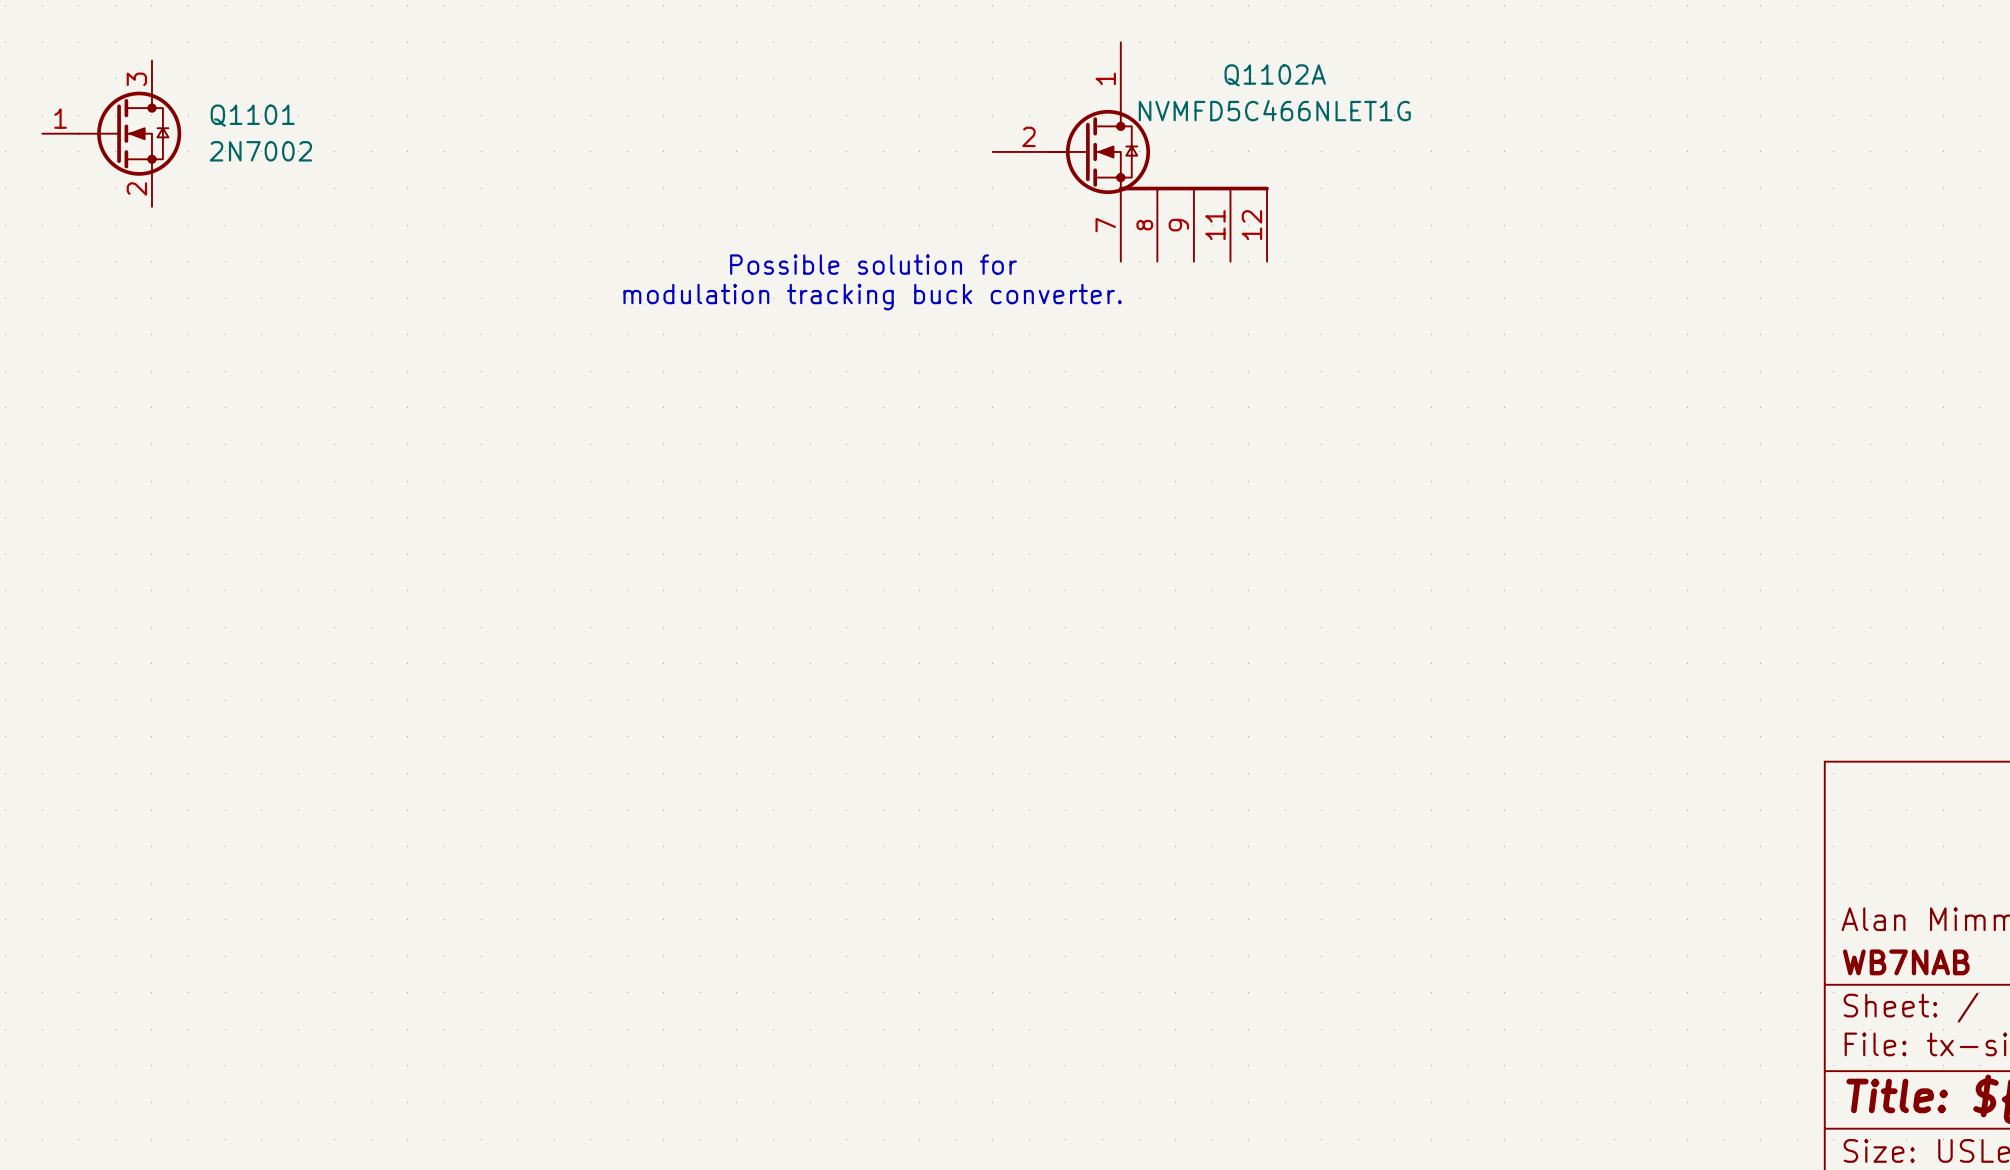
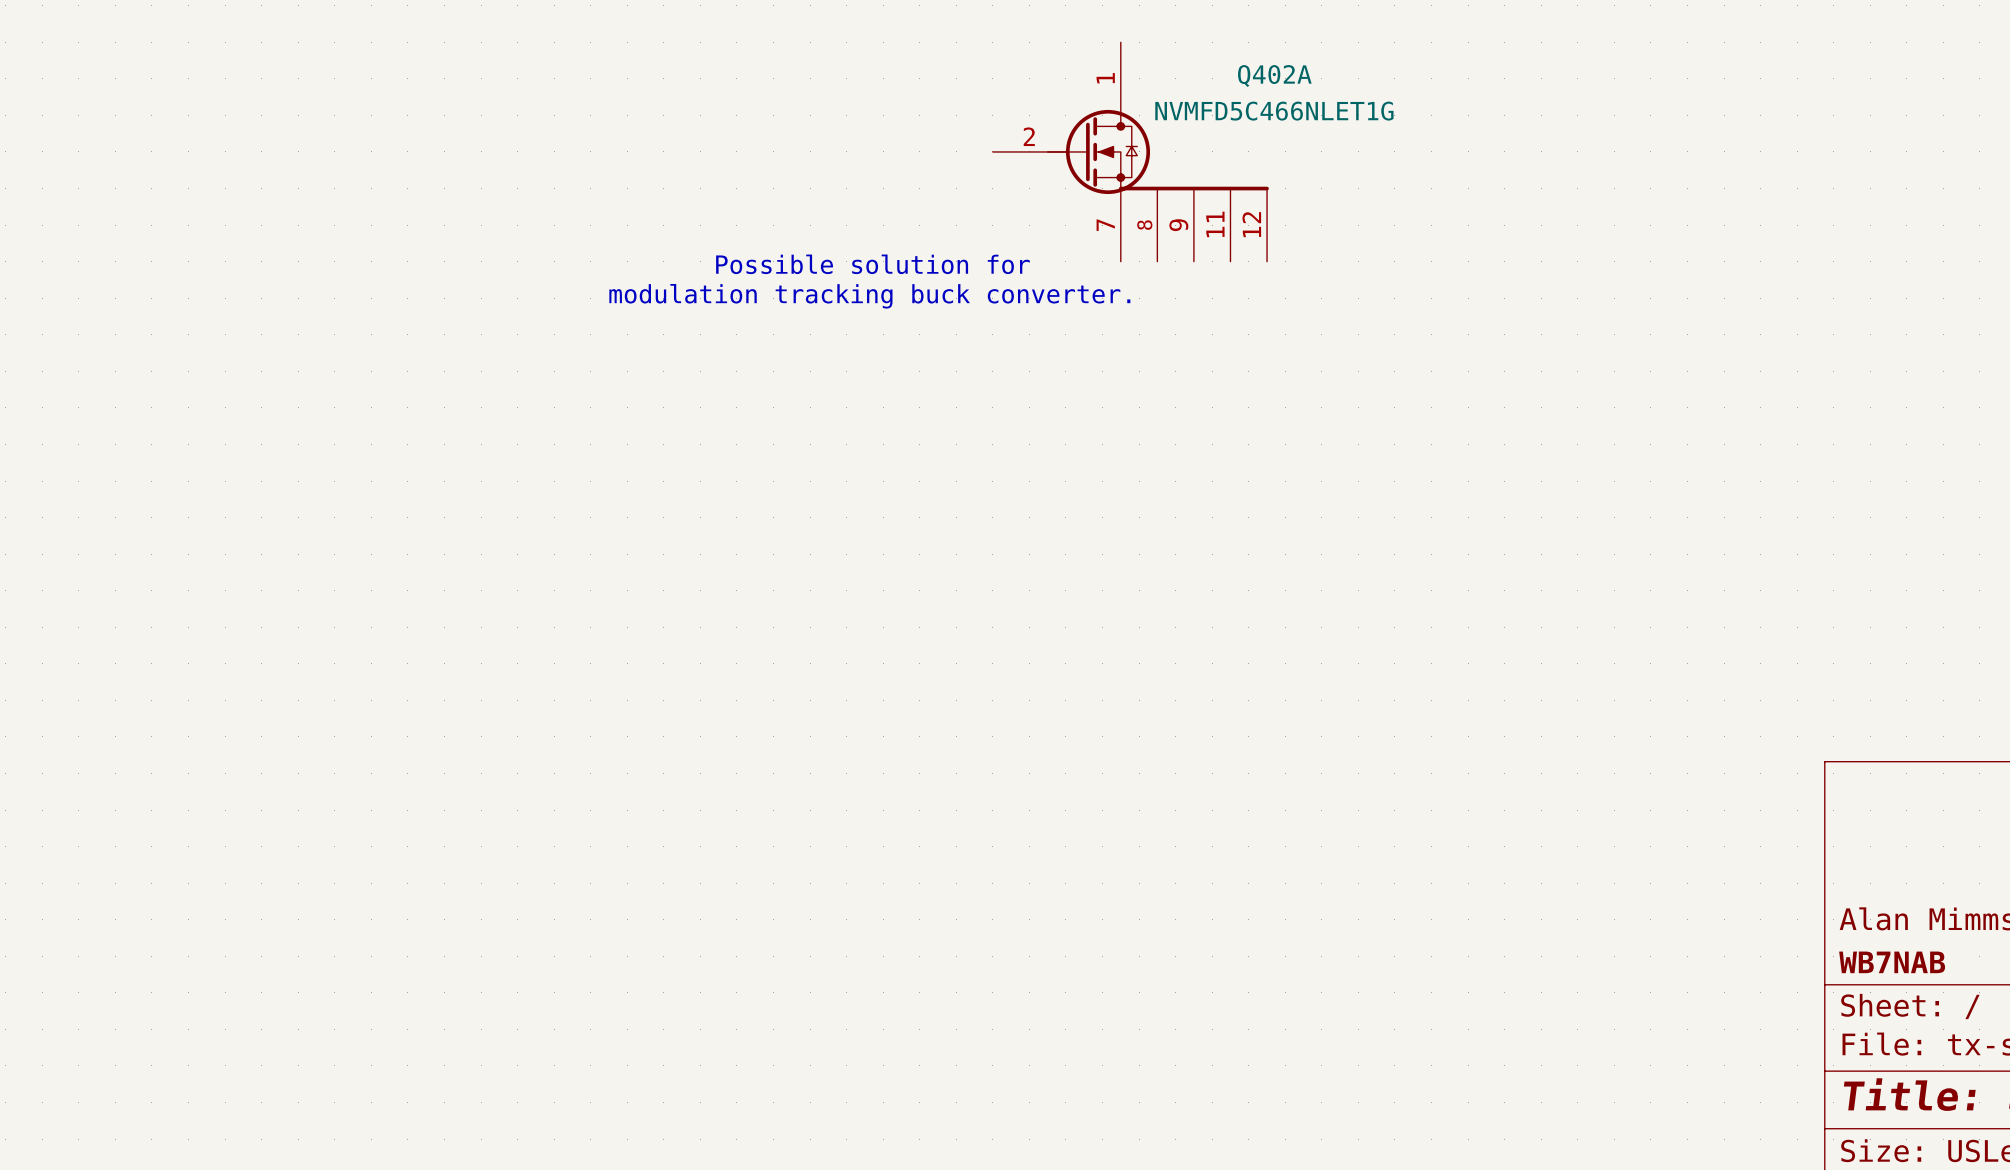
Q1102A name: Q1102A (1275, 75) -> Q402A (1274, 76)
Q1101: 2N7002 (111, 133) -> none

